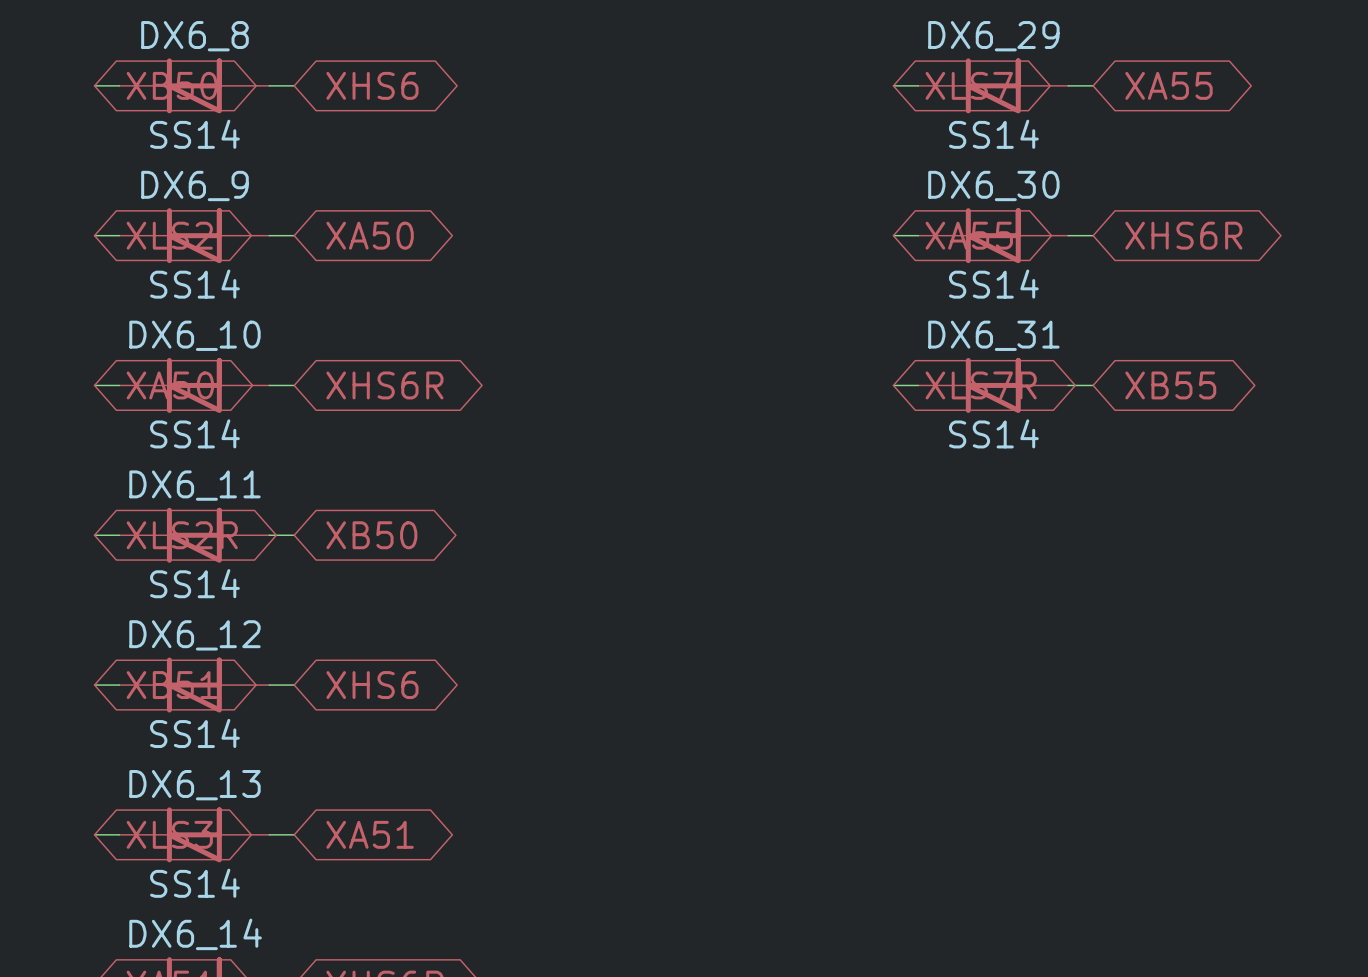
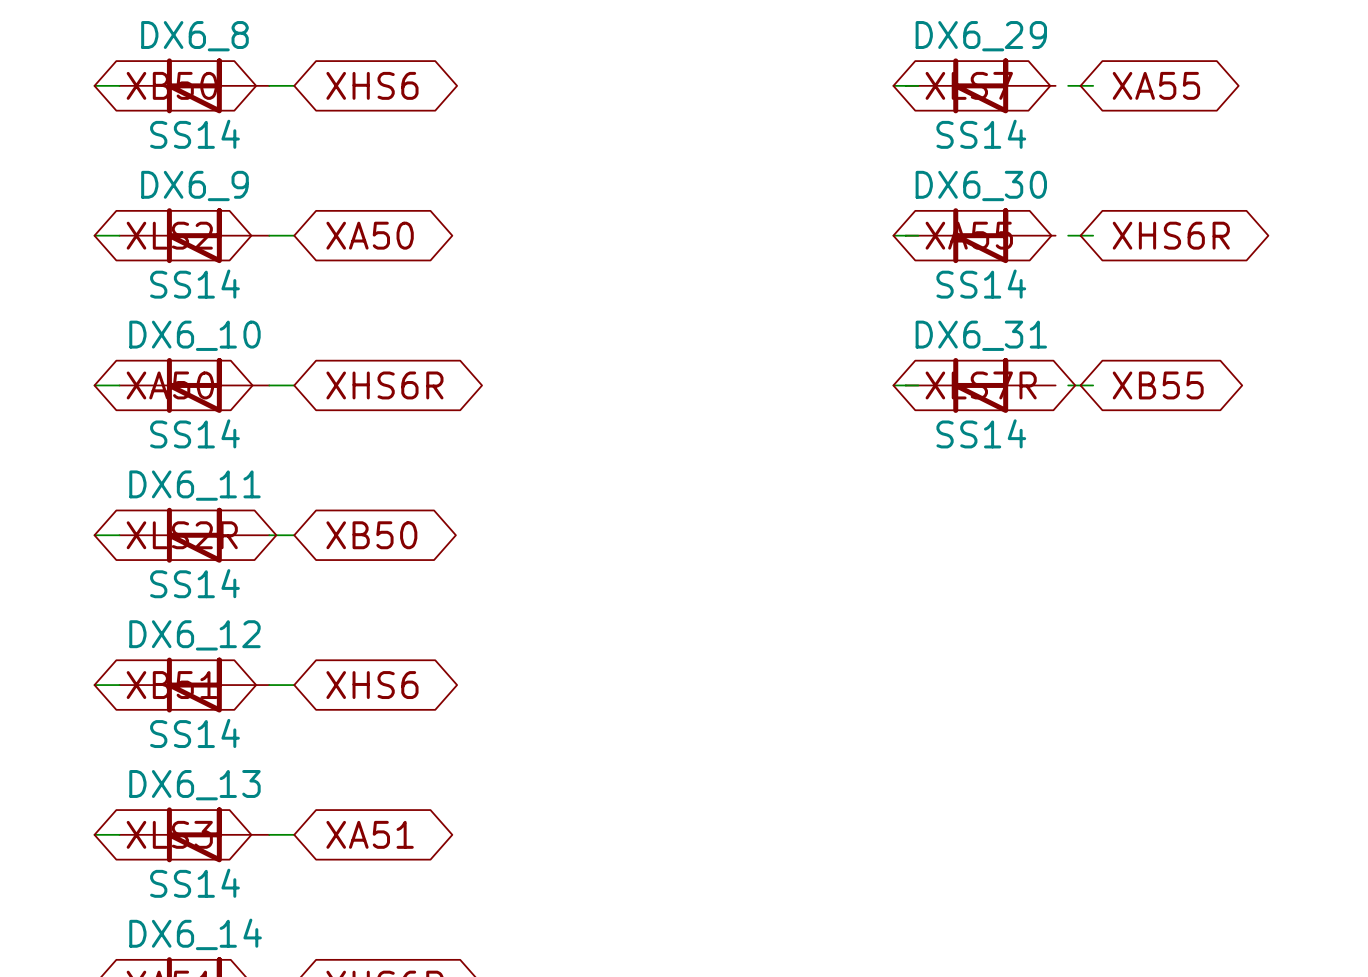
DX6_29 position: (993, 85) -> (980, 85)
global label position: XA55 (1168, 85) -> XA55 (1156, 85)
DX6_30 position: (993, 235) -> (980, 235)
global label position: XHS6R (1183, 235) -> XHS6R (1171, 235)
DX6_31 position: (993, 385) -> (980, 385)
global label position: XB55 (1170, 385) -> XB55 (1158, 385)

